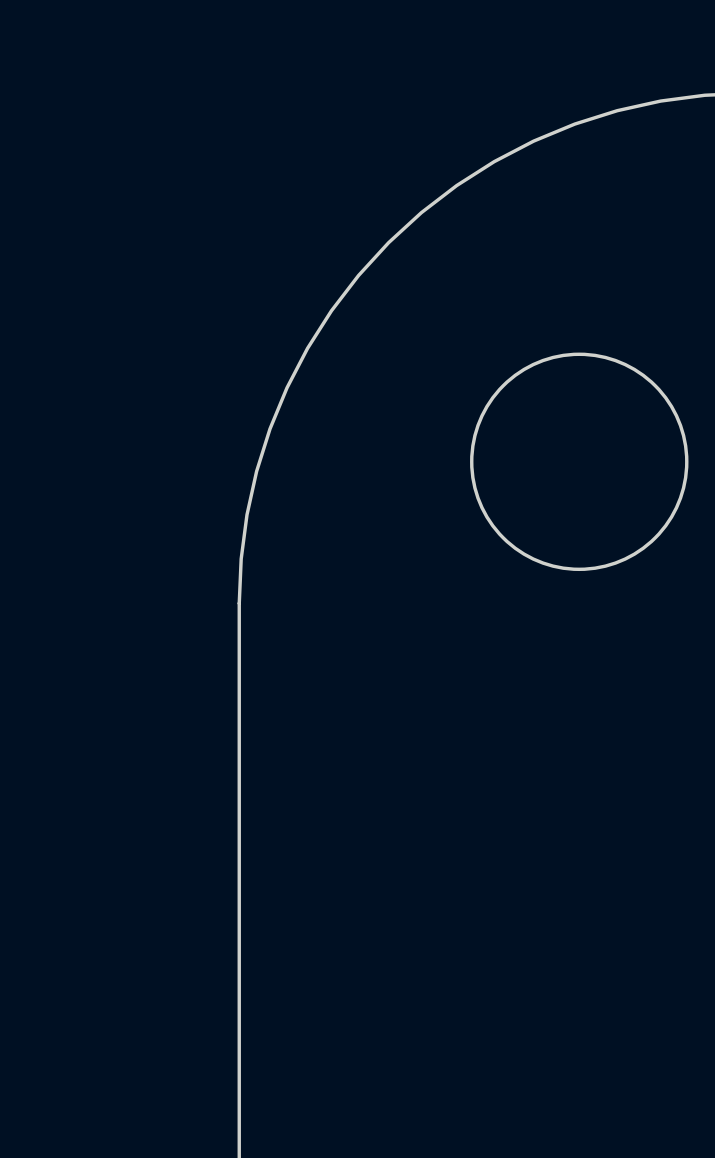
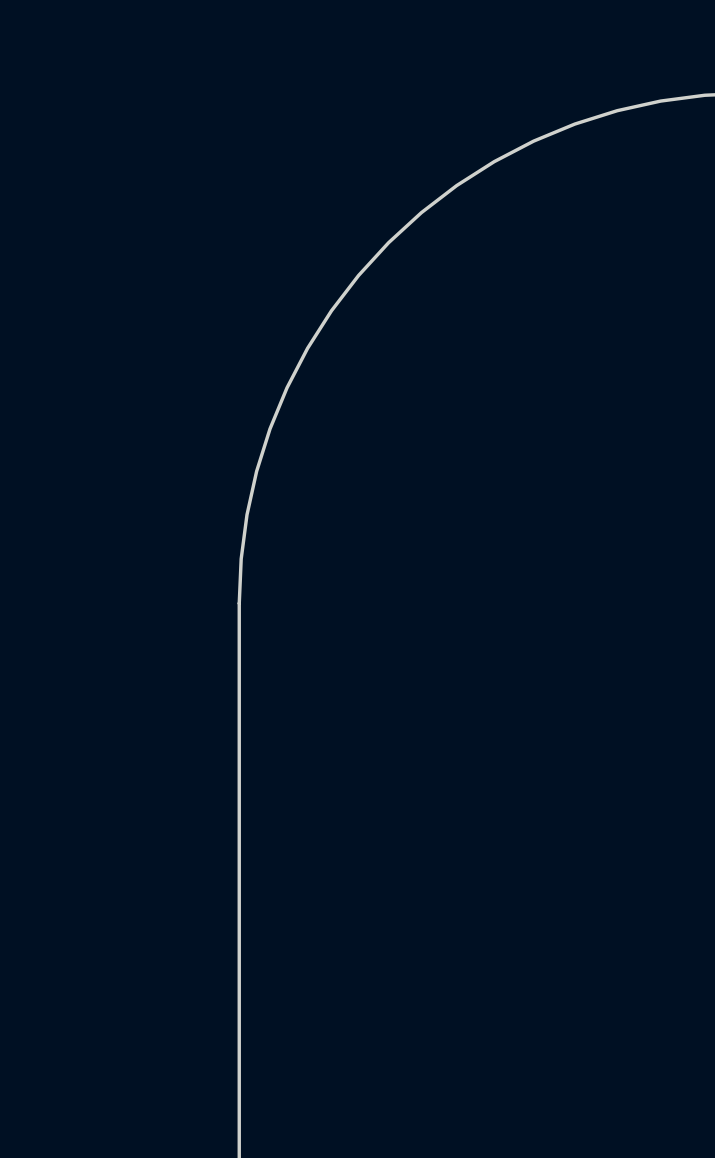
round board edge: [470, 352, 689, 572] -> none

